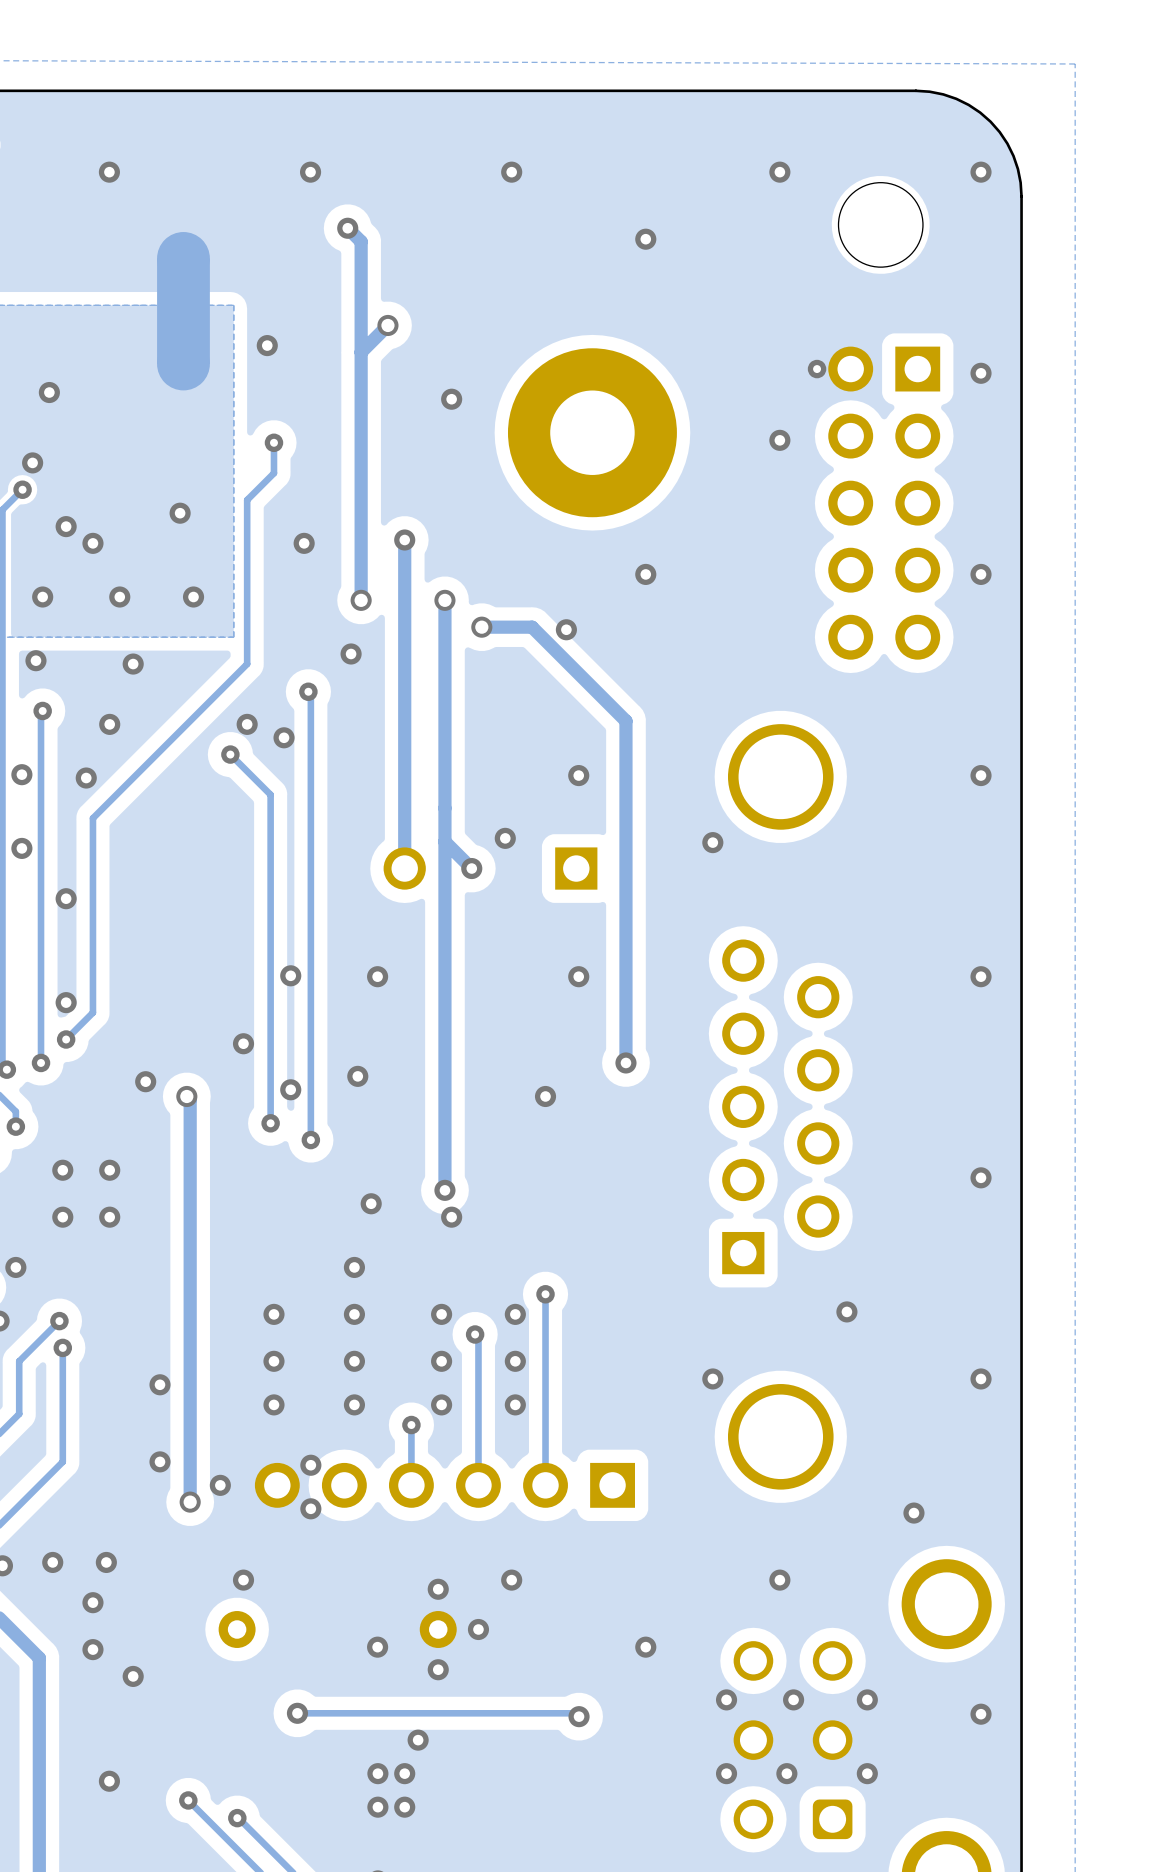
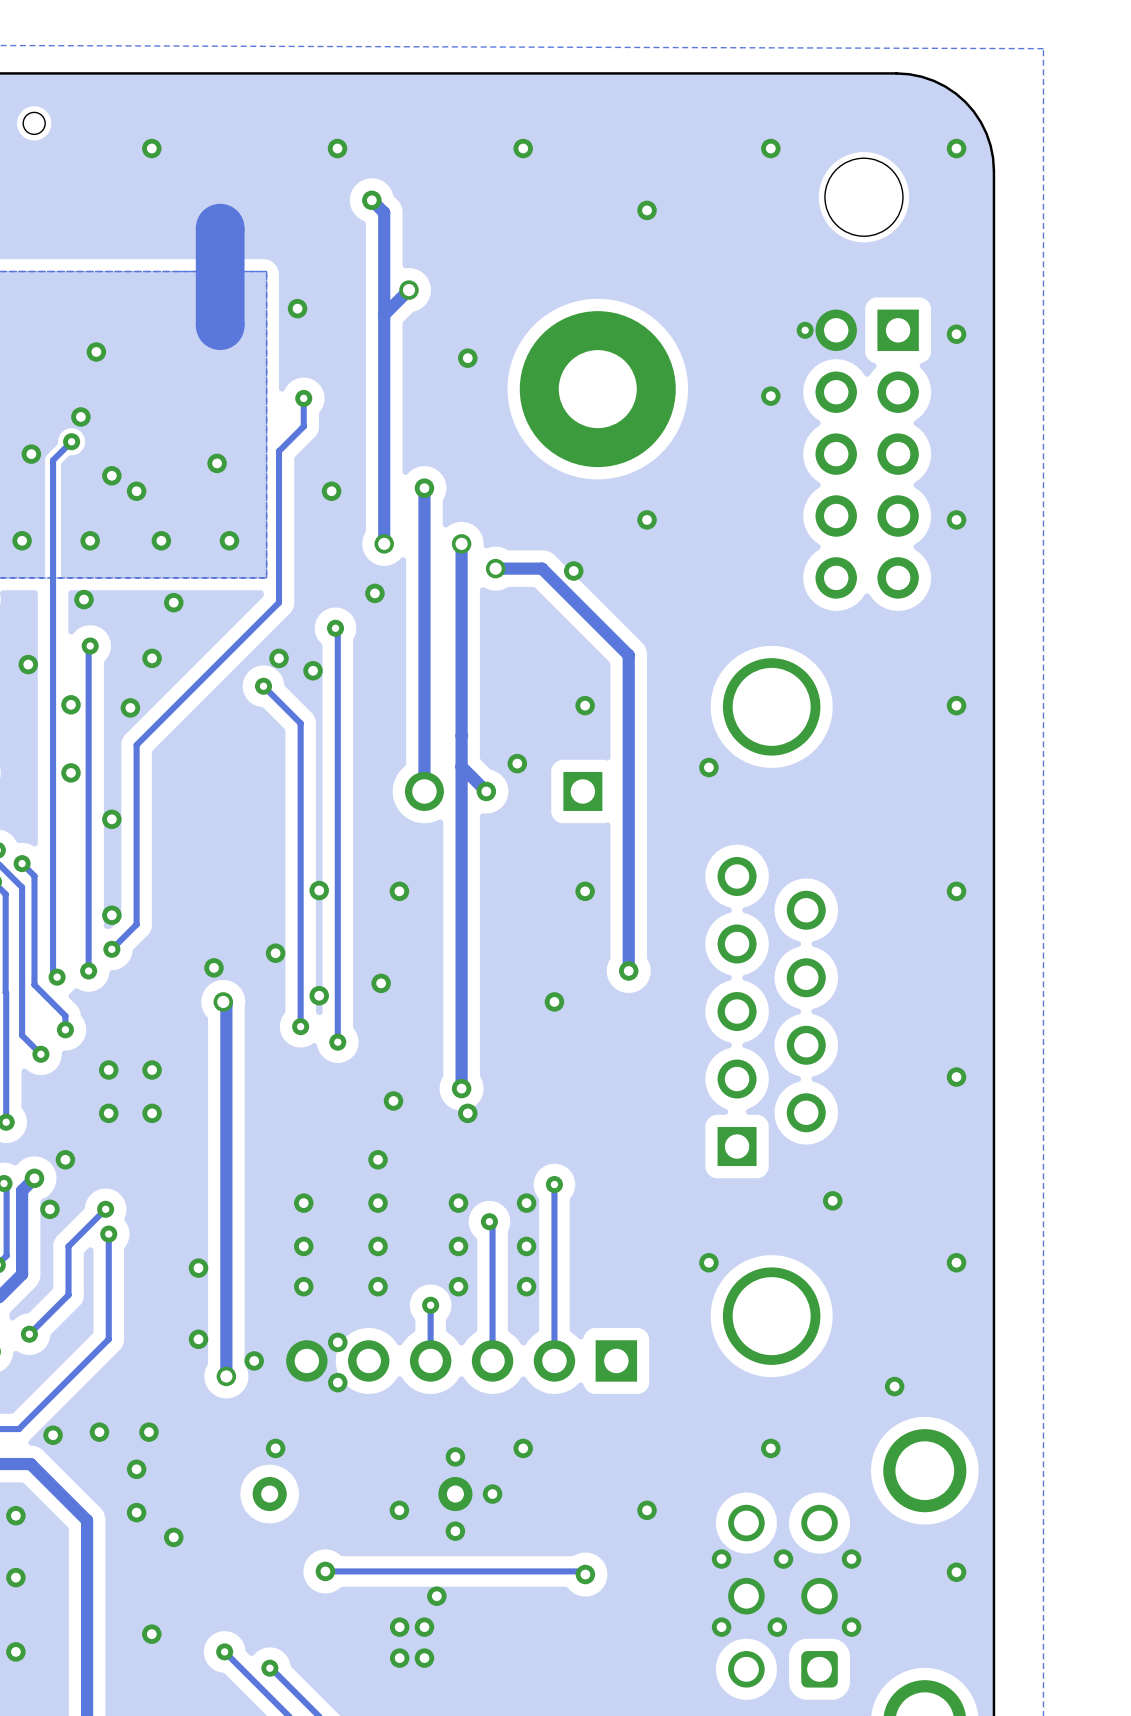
via position: (145, 1081) -> (213, 967)

